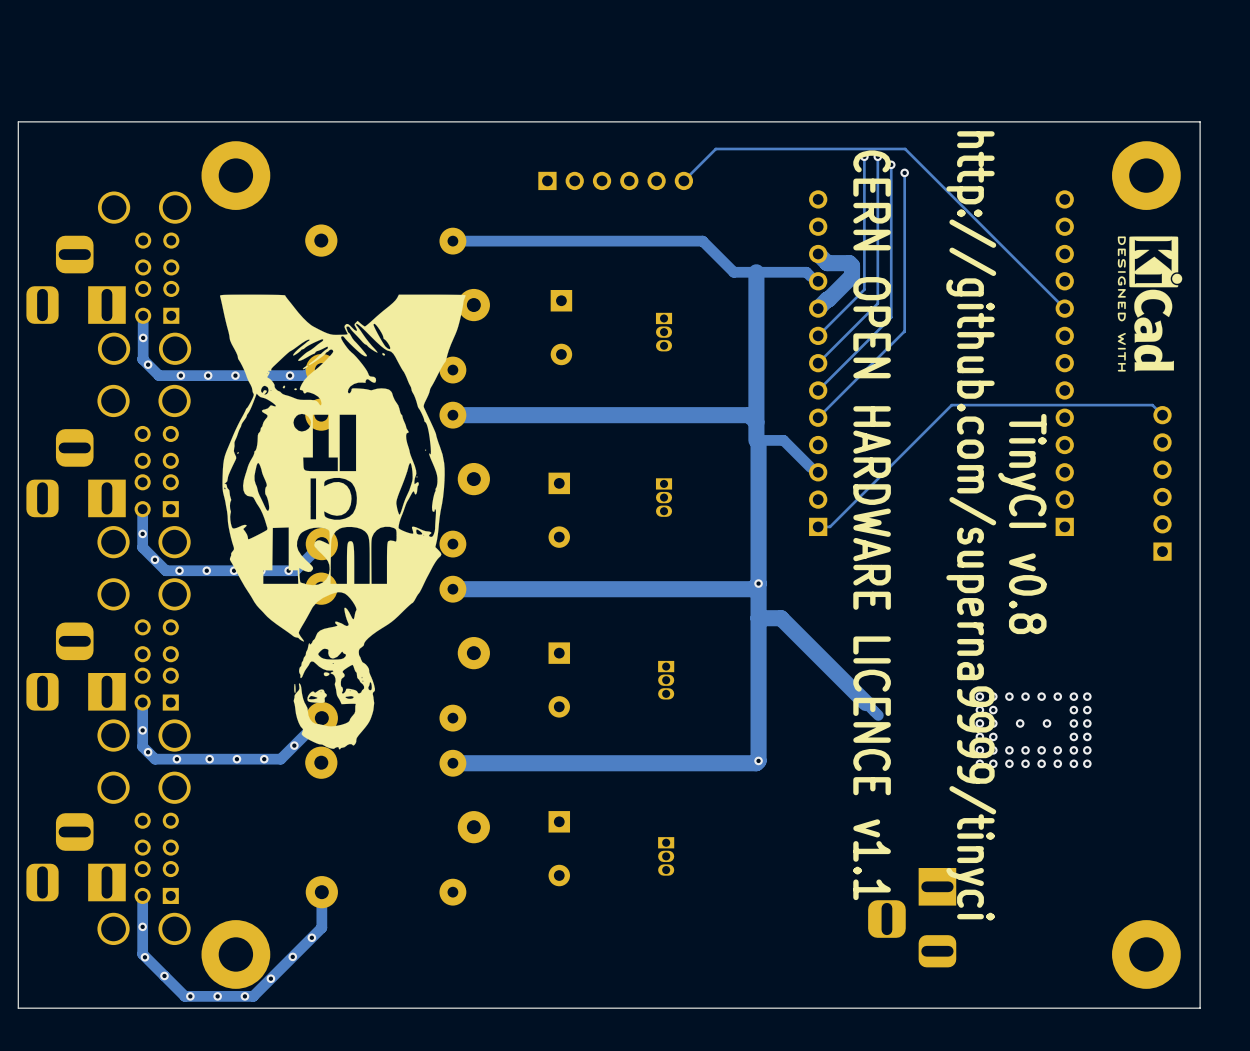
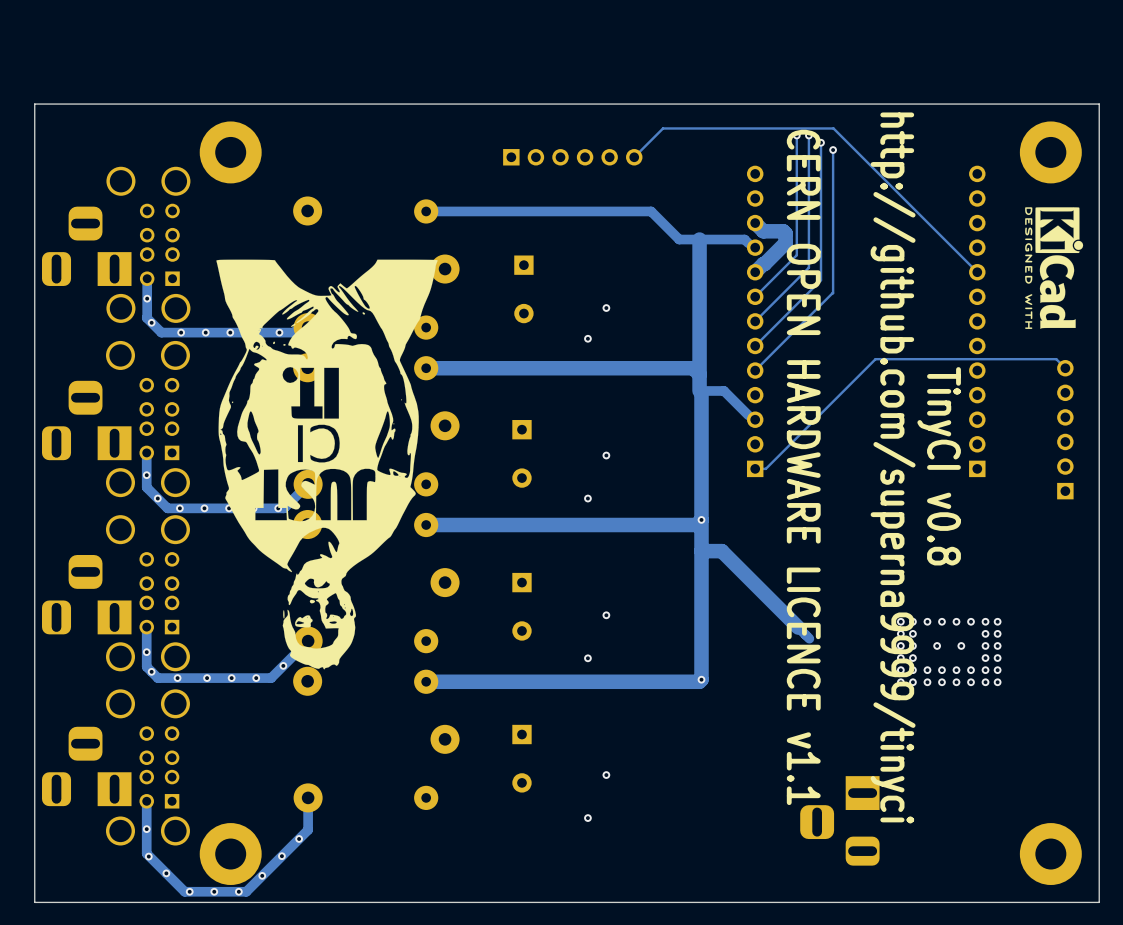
part: (664, 332) -> none
via: none -> (606, 308)
via: none -> (587, 338)
part: (664, 497) -> none
via: none -> (606, 455)
via: none -> (587, 498)
part: (666, 680) -> none
via: none -> (606, 615)
via: none -> (587, 658)
part: (666, 856) -> none
via: none -> (606, 775)
via: none -> (587, 818)

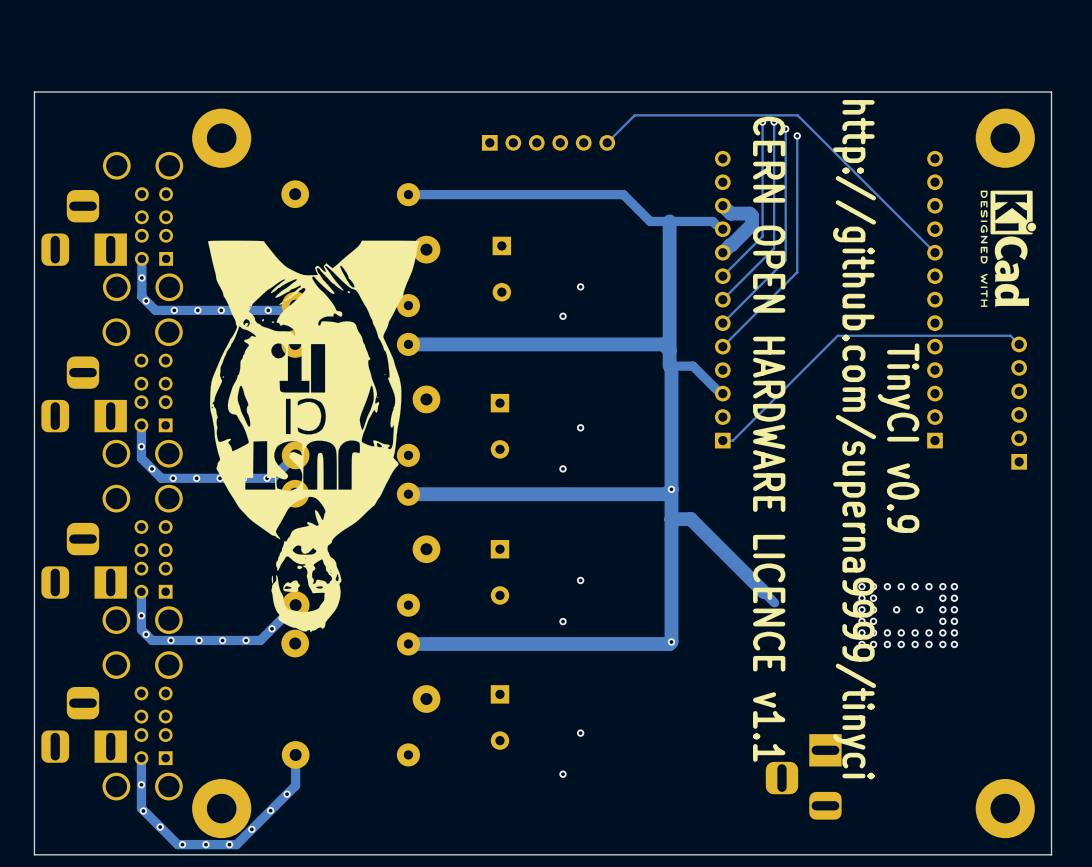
text: TinyCI v0.8 (939, 466) -> TinyCI v0.9 (898, 438)

